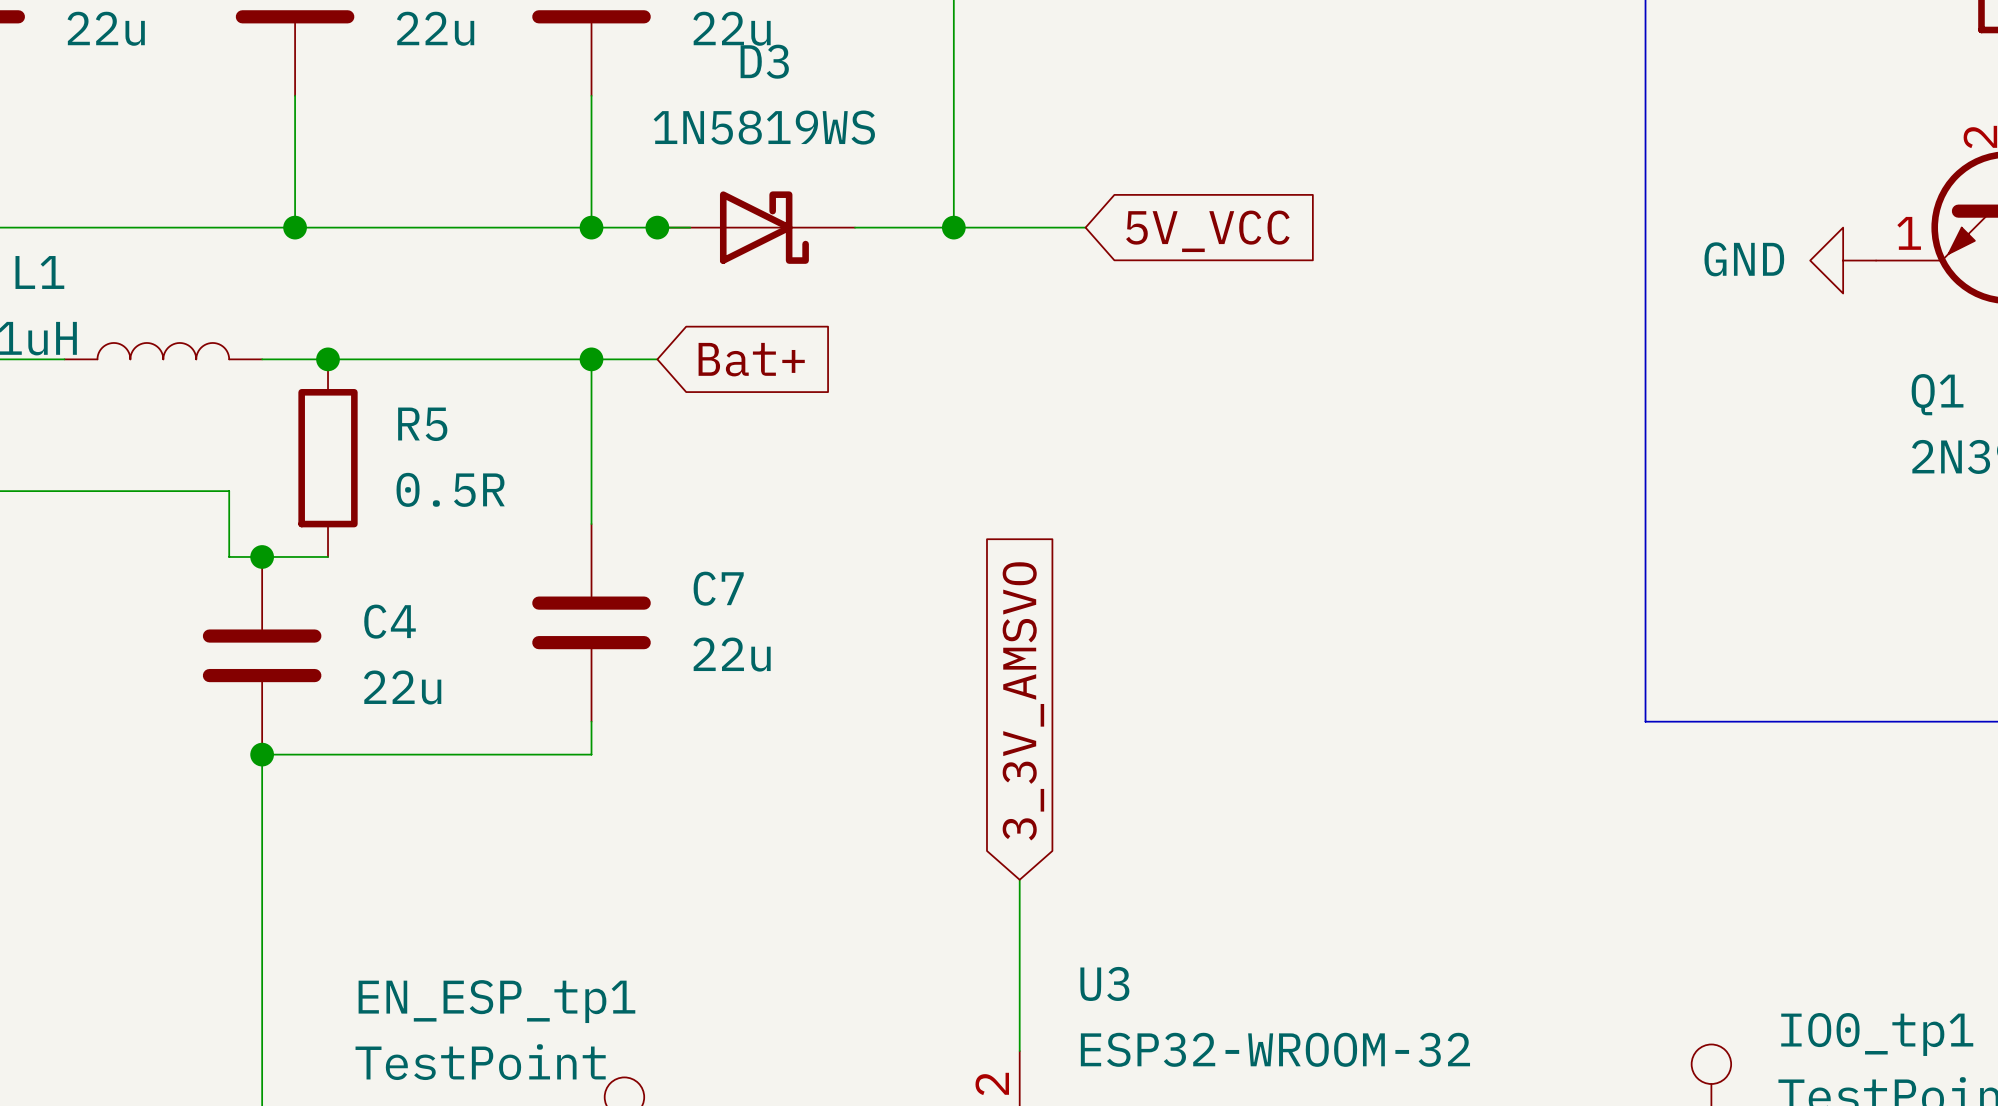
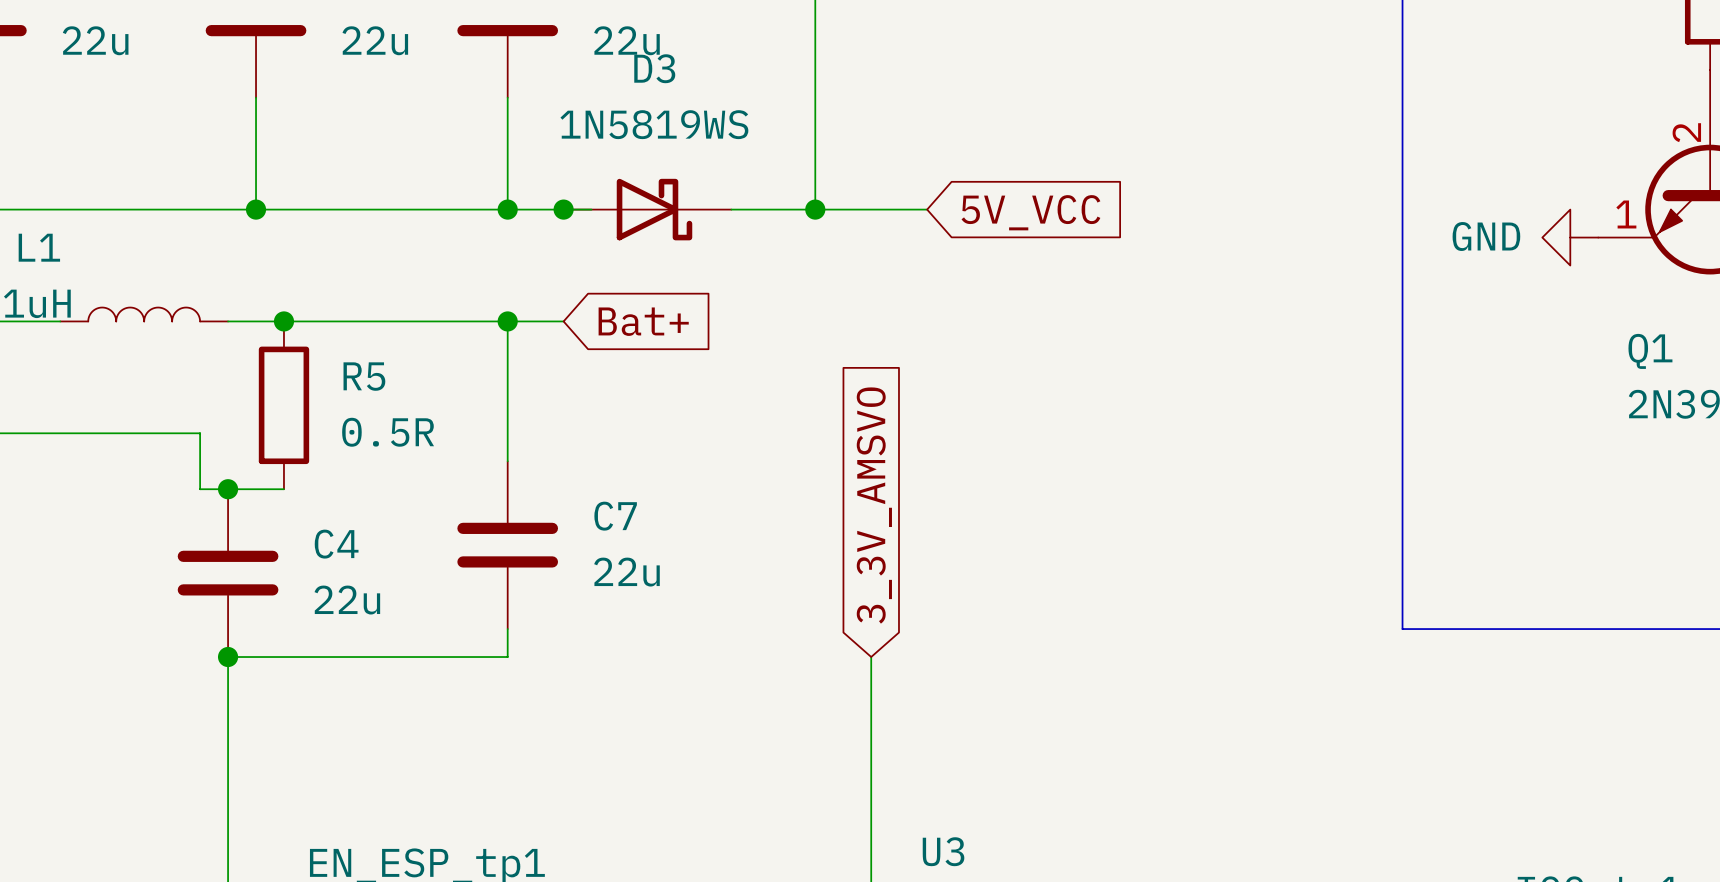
global label position: 3_3V_AMSVO (1023, 701) -> 3_3V_AMSVO (874, 505)
wire: none -> (871, 657) (871, 763)

